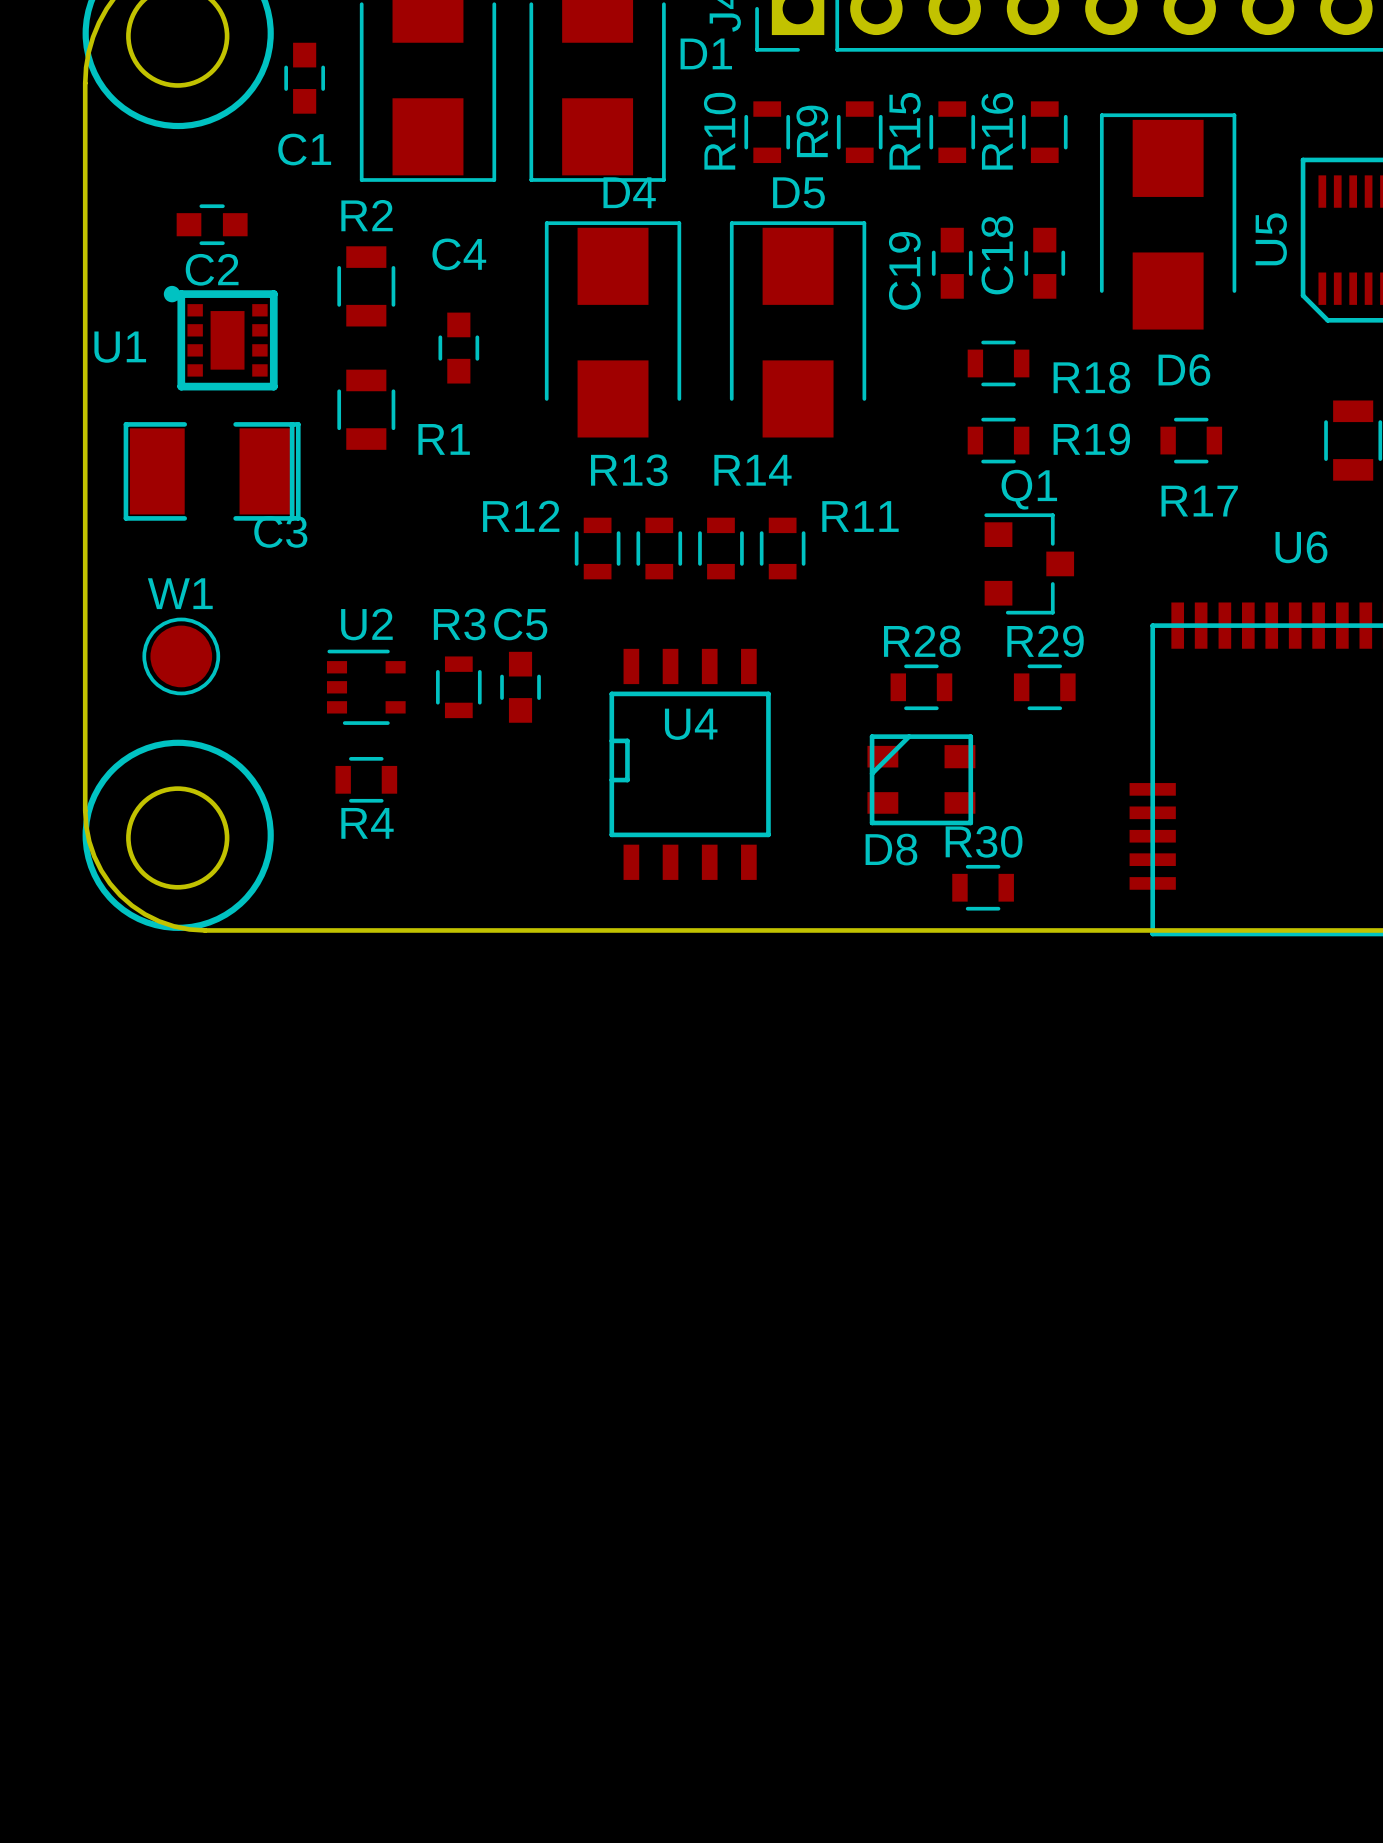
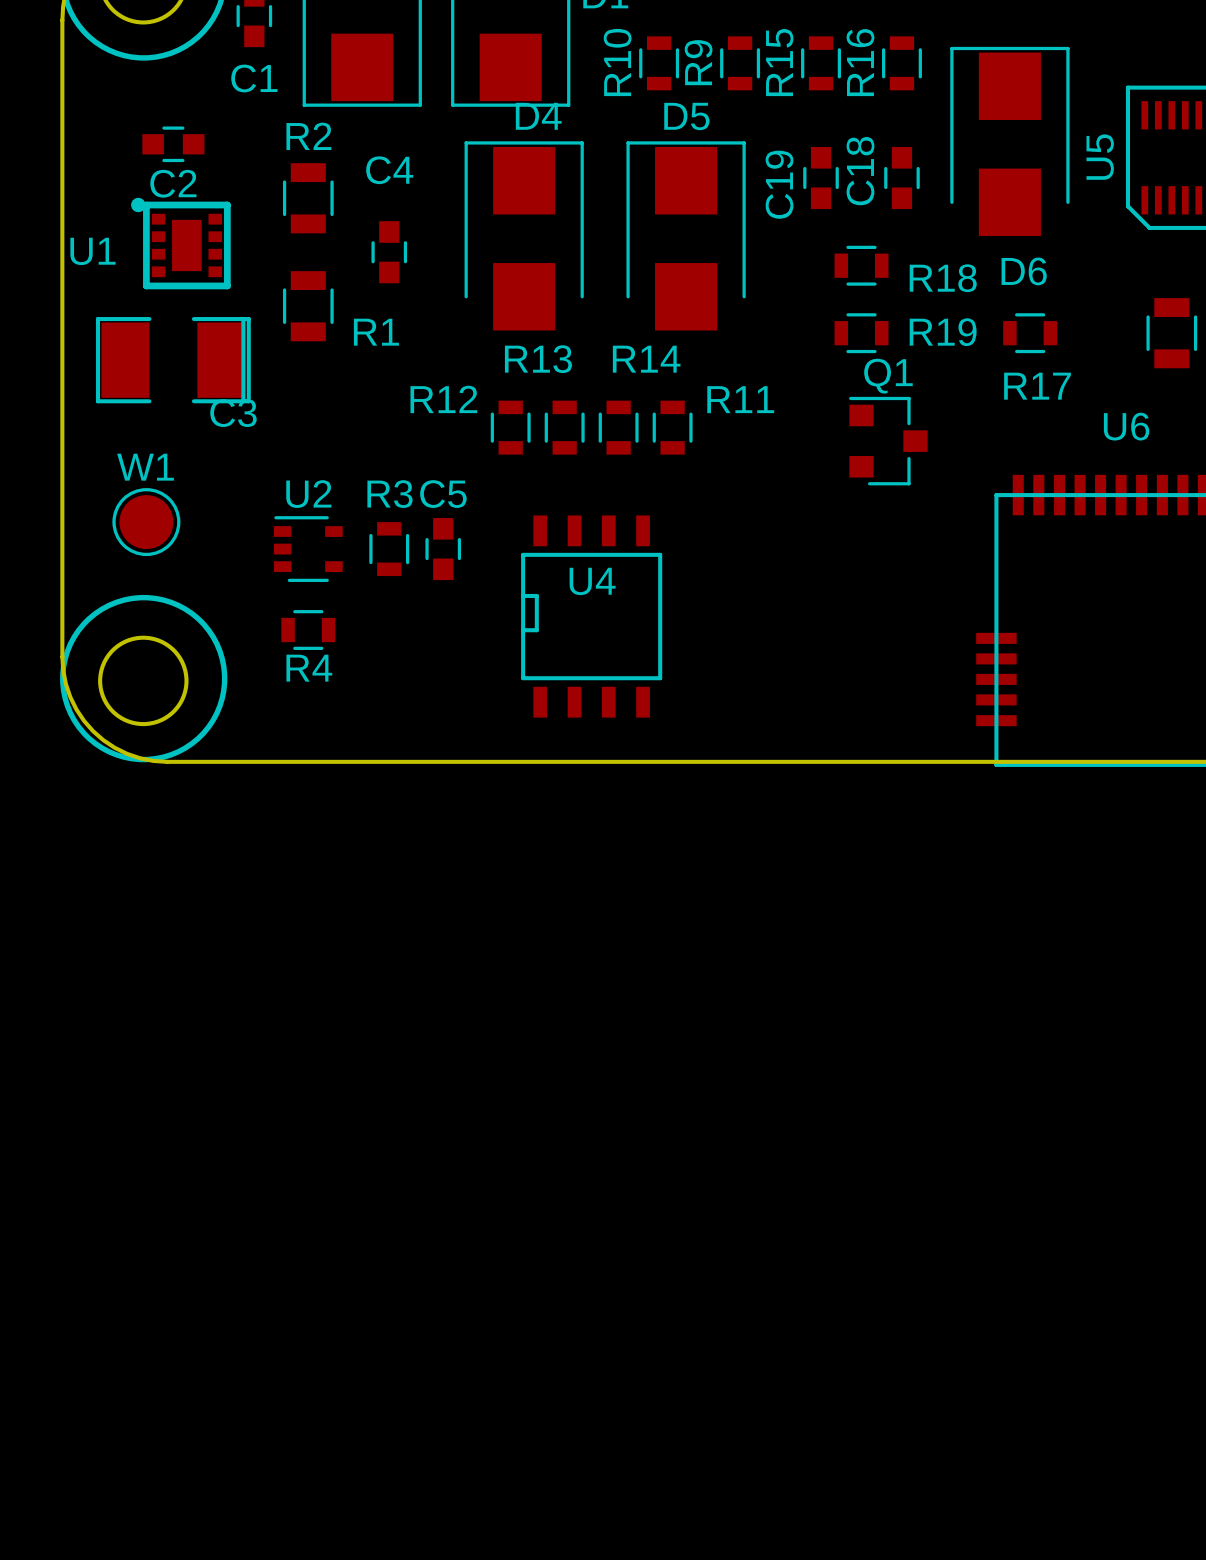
R28: (921, 687) -> none
R29: (1044, 687) -> none
D8: (921, 779) -> none
R30: (983, 887) -> none

